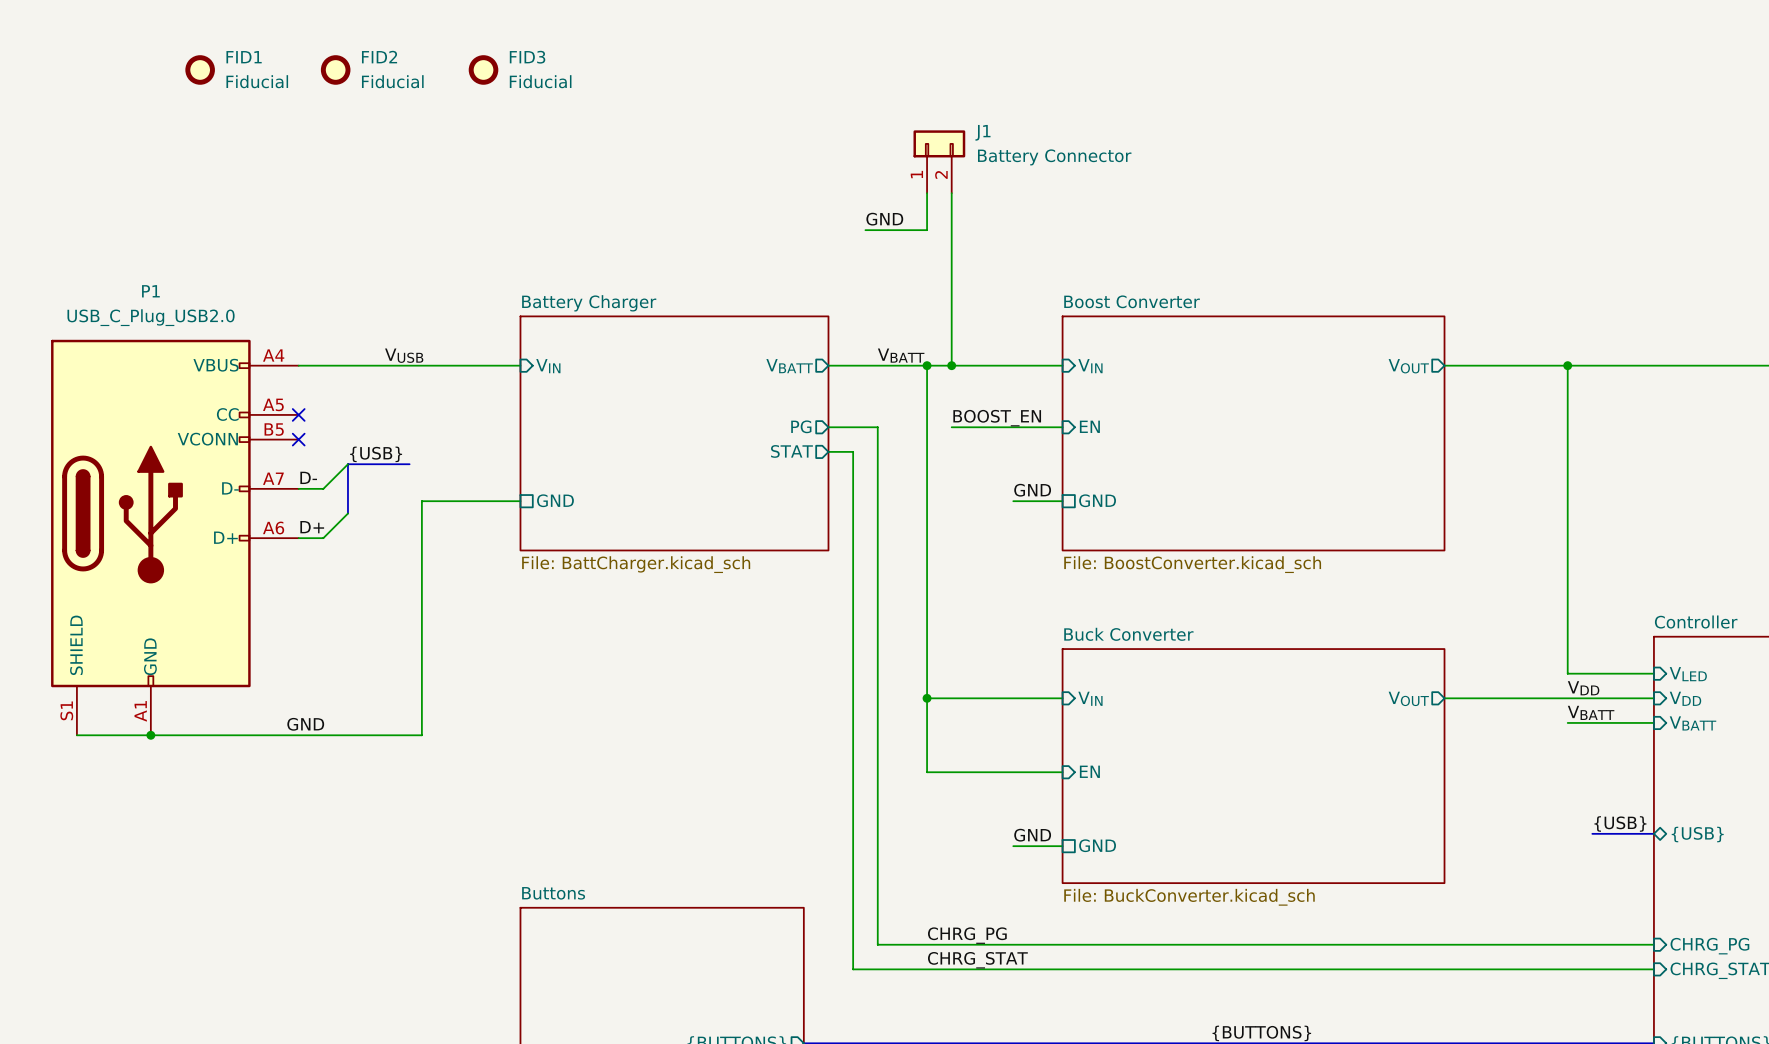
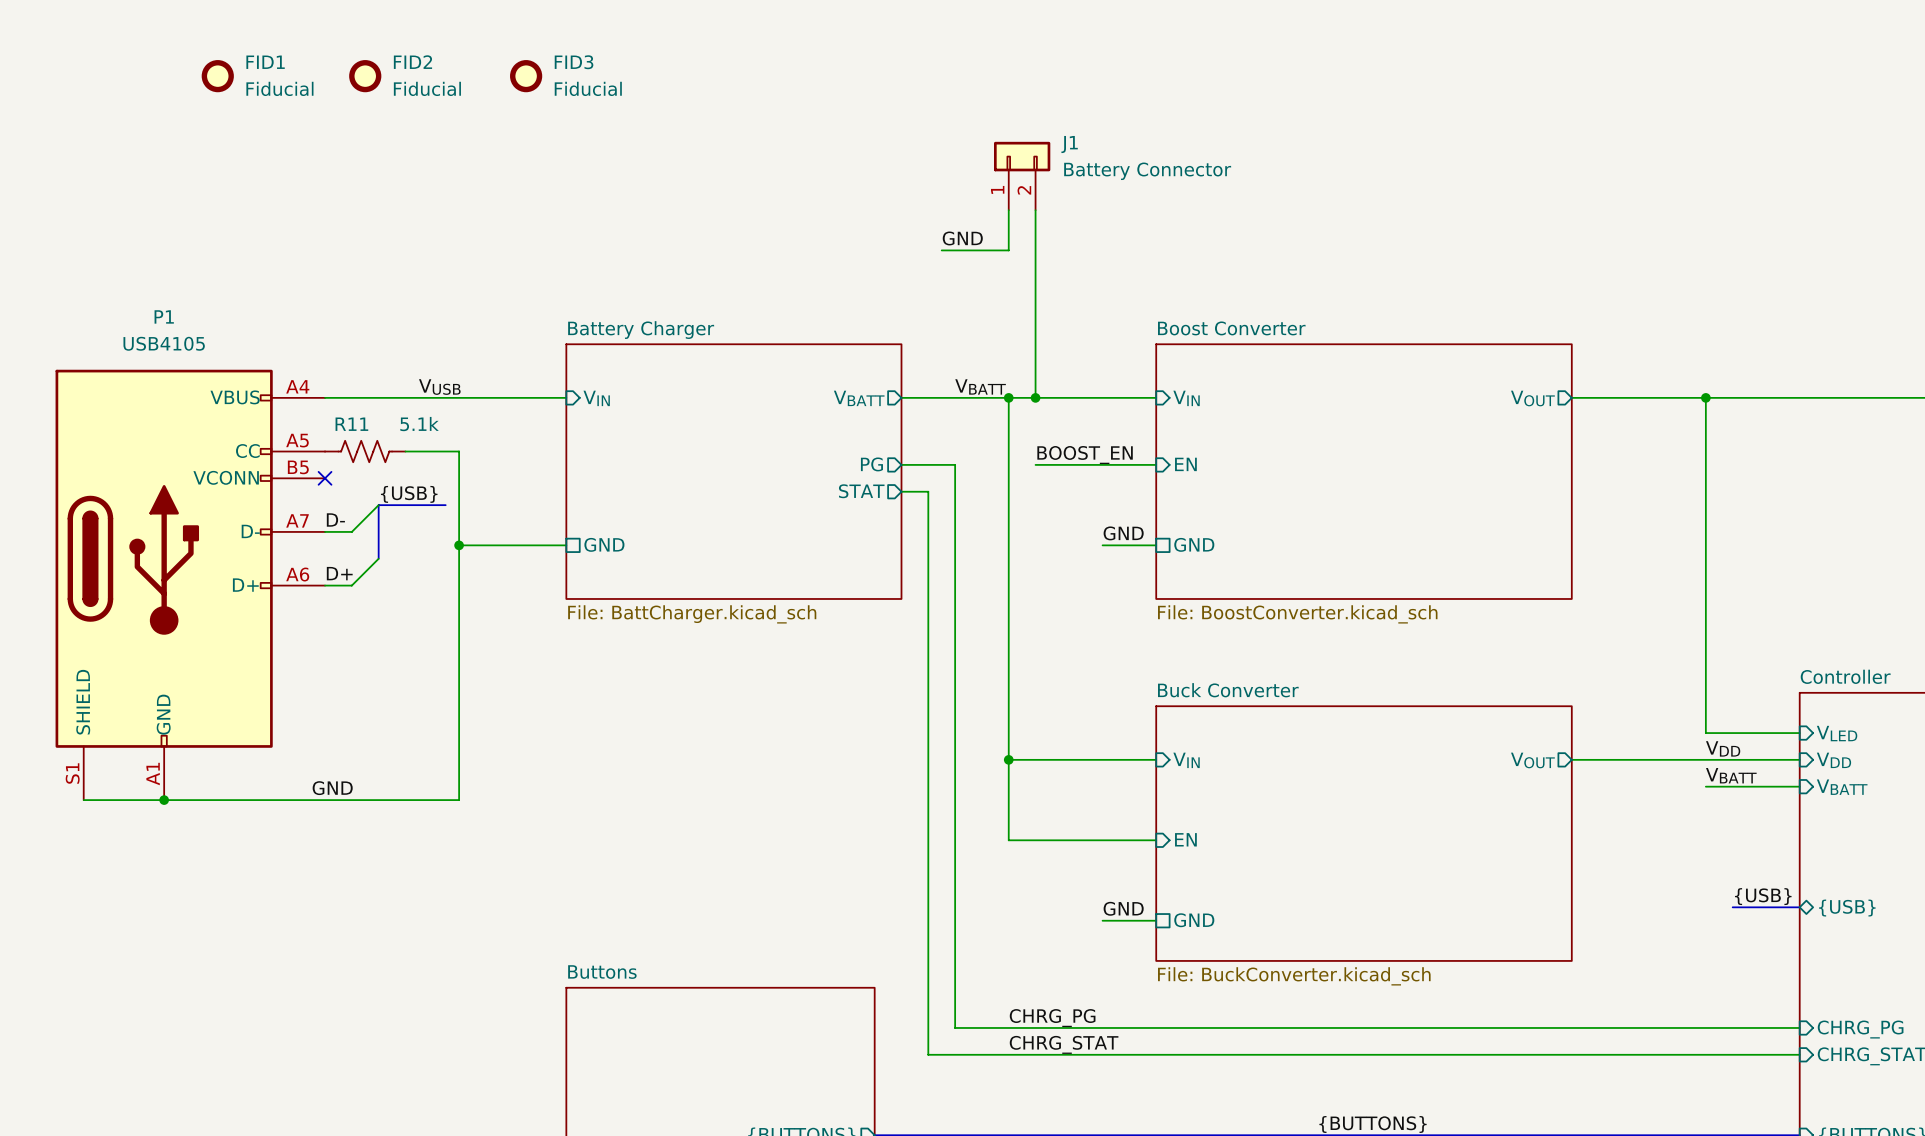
P1 value: USB_C_Plug_USB2.0 (151, 317) -> USB4105 (164, 343)
no-connect mark: (298, 414) -> none
R11: none -> 5.1k (365, 451)
wire: none -> (405, 451) (459, 451) (459, 545)
junction: none -> (459, 545)

